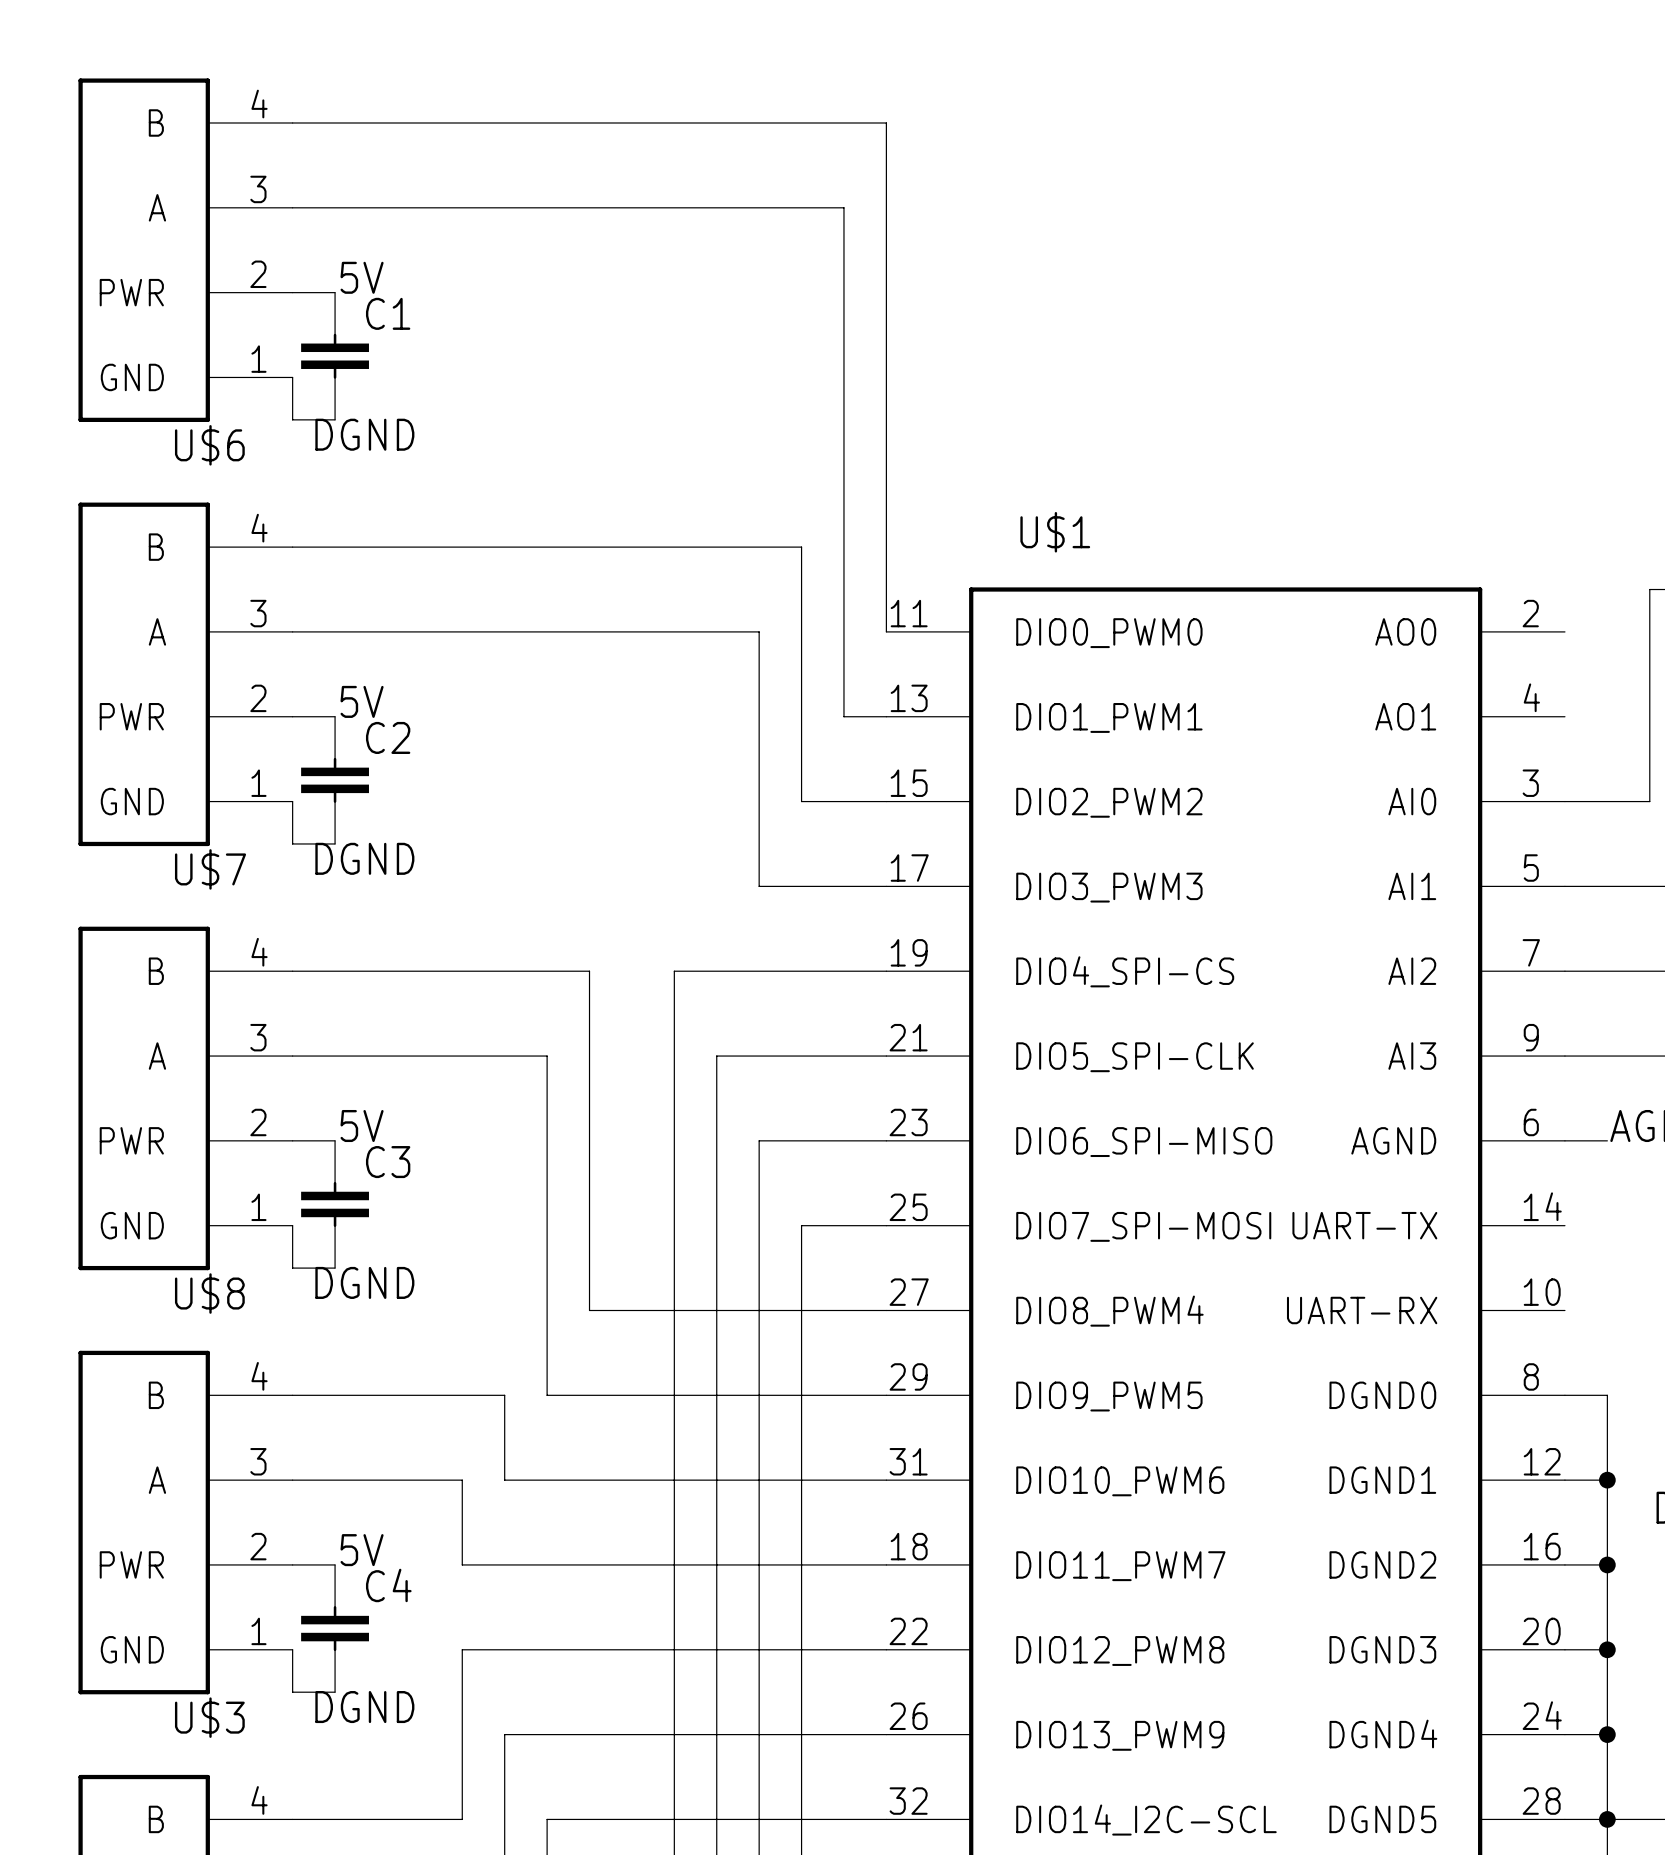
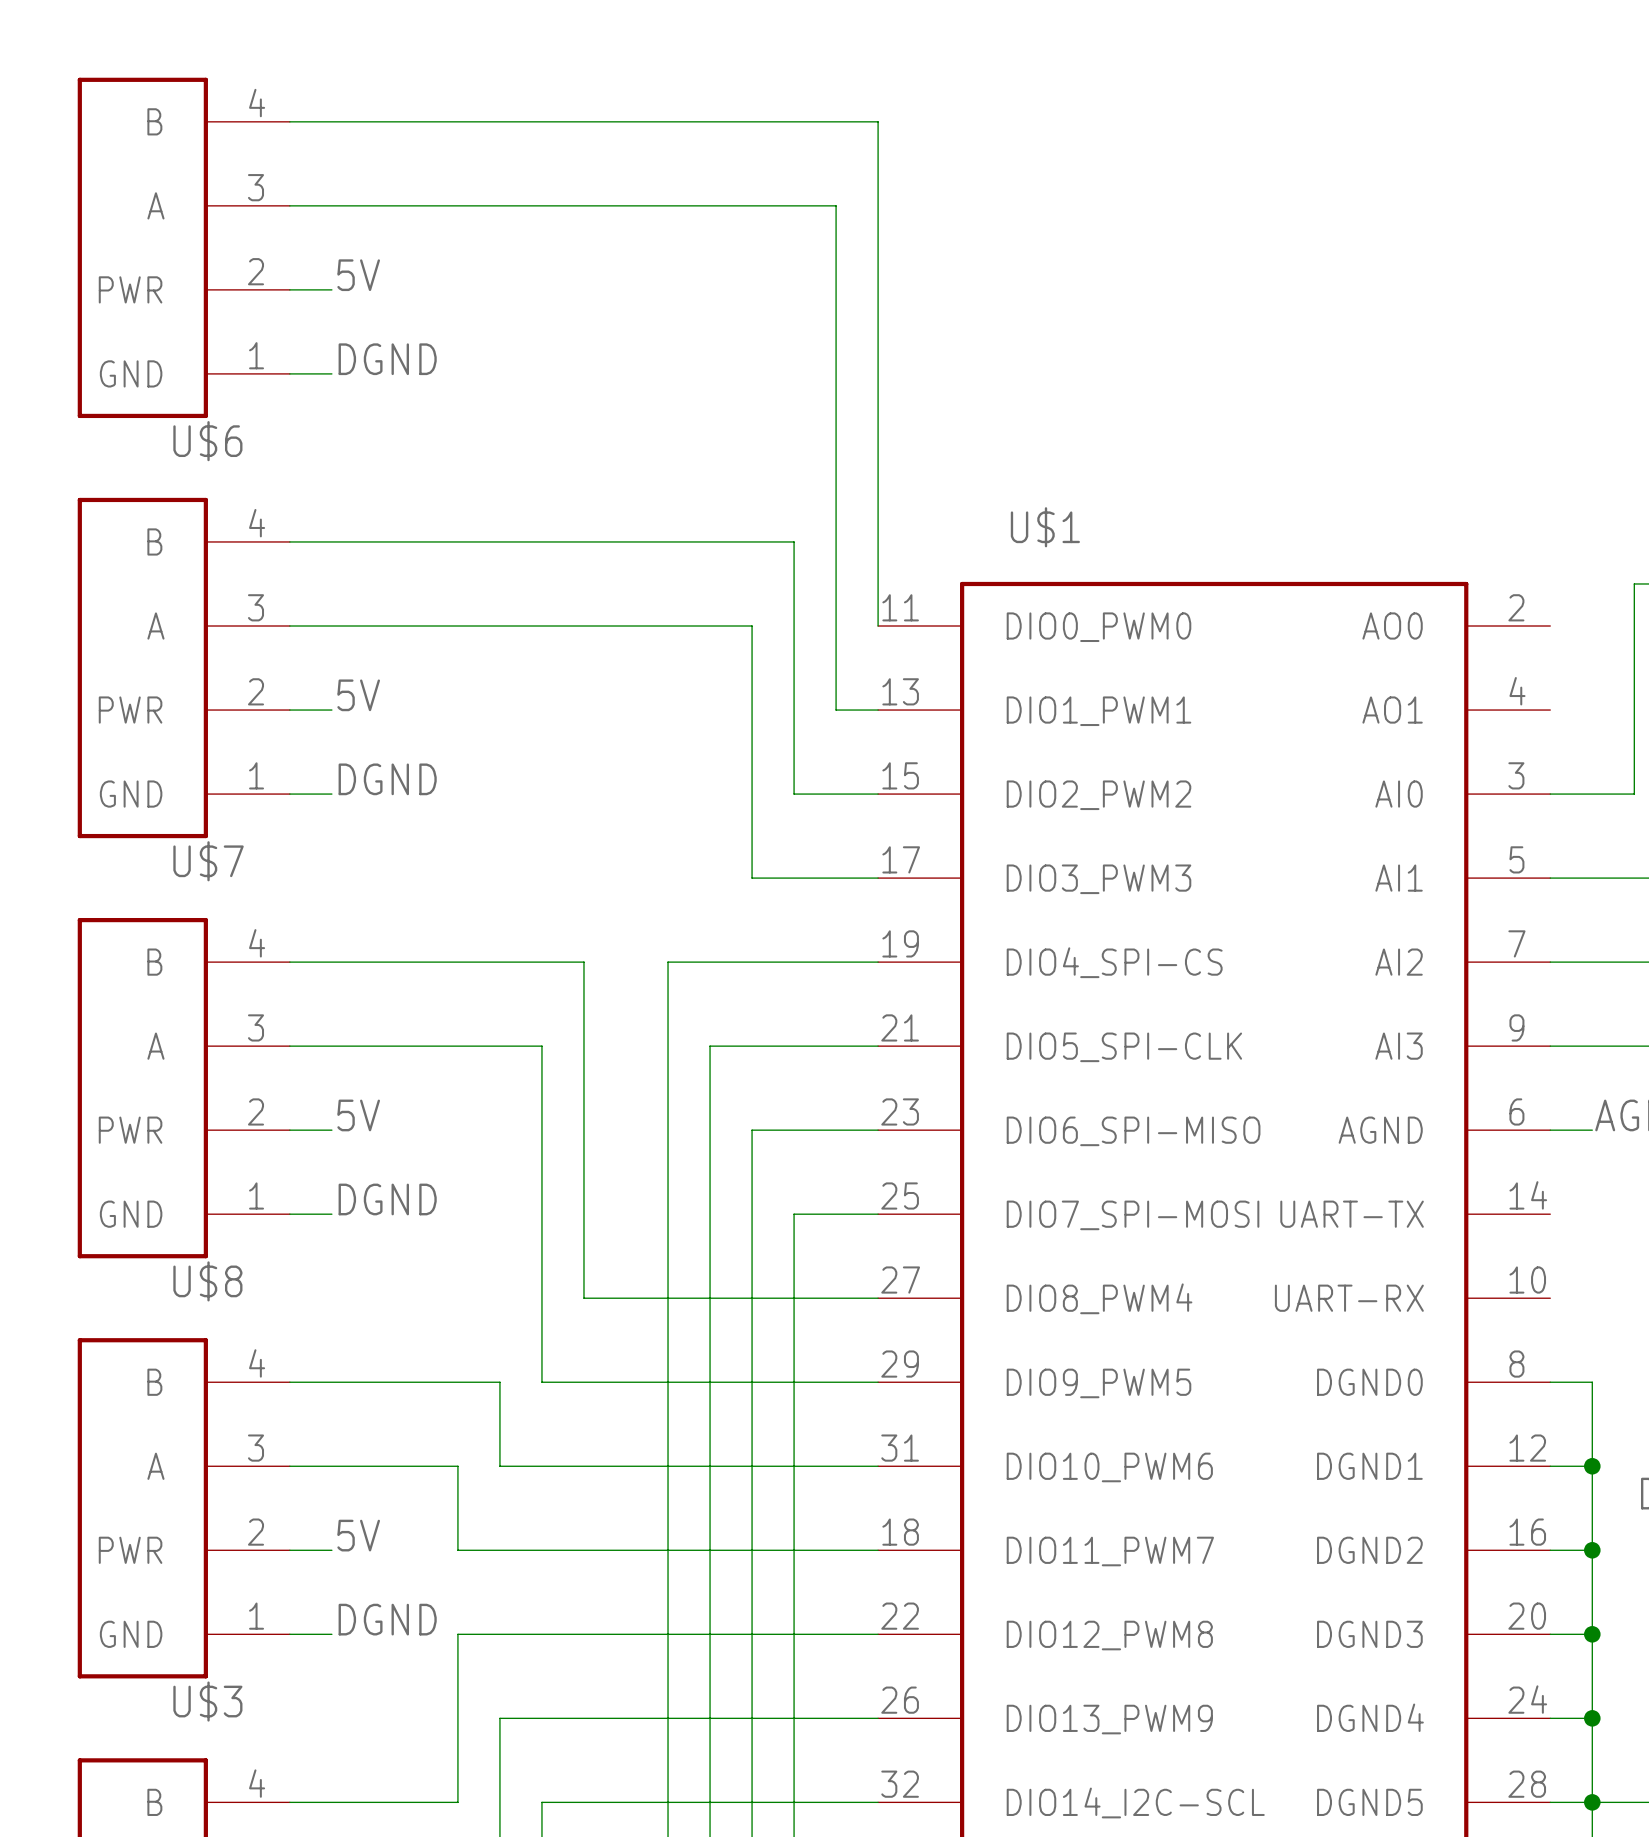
C1: (335, 356) -> none
wire: (292, 377) (292, 419) (335, 419) -> (289, 373) (331, 373)
label position: DGND (364, 434) -> DGND (387, 359)
C2: (335, 780) -> none
wire: (292, 801) (292, 843) (335, 843) -> (289, 794) (331, 794)
label position: DGND (364, 858) -> DGND (387, 779)
C3: (335, 1204) -> none
wire: (292, 1225) (292, 1268) (335, 1268) -> (289, 1214) (331, 1214)
label position: DGND (364, 1282) -> DGND (387, 1199)
C4: (335, 1628) -> none
wire: (292, 1649) (292, 1692) (335, 1692) -> (289, 1634) (331, 1634)
label position: DGND (364, 1707) -> DGND (387, 1619)

